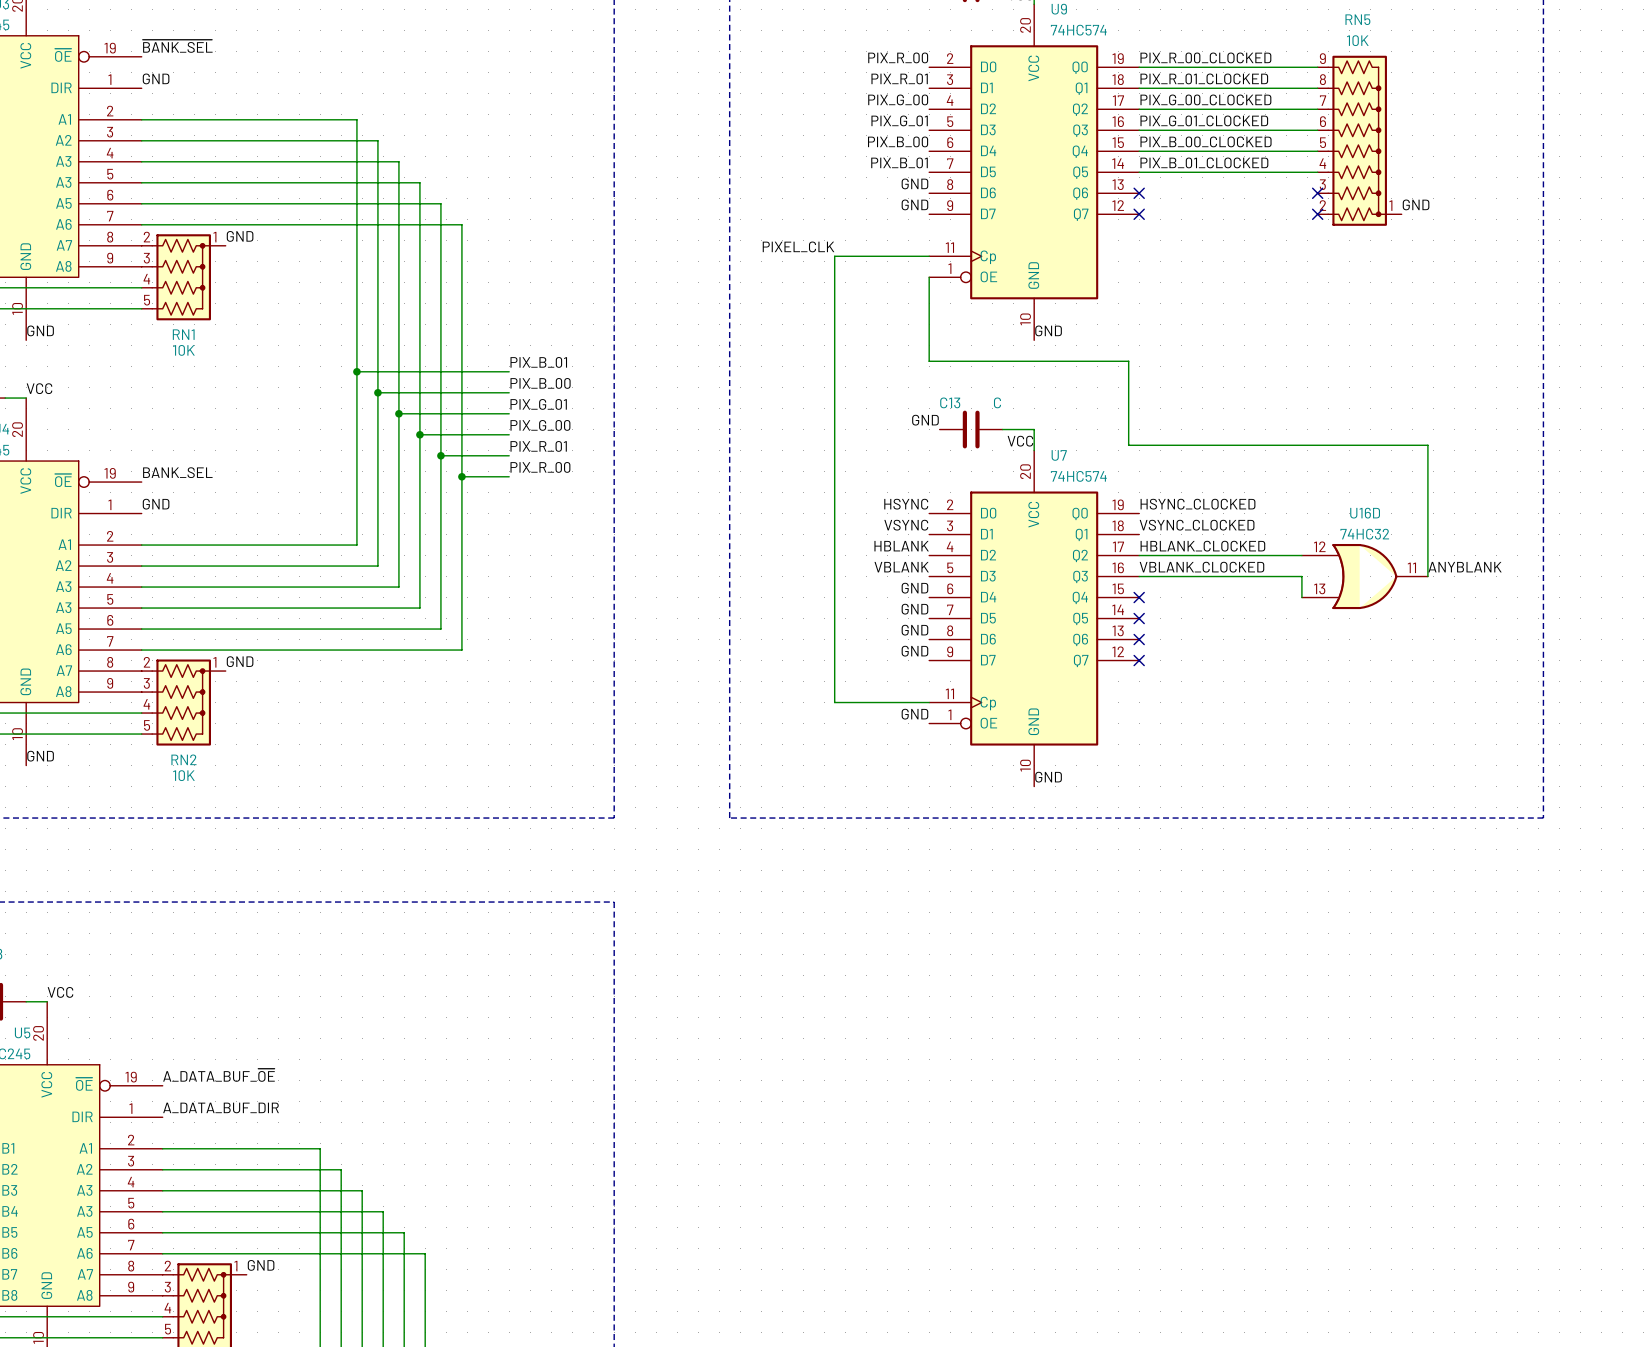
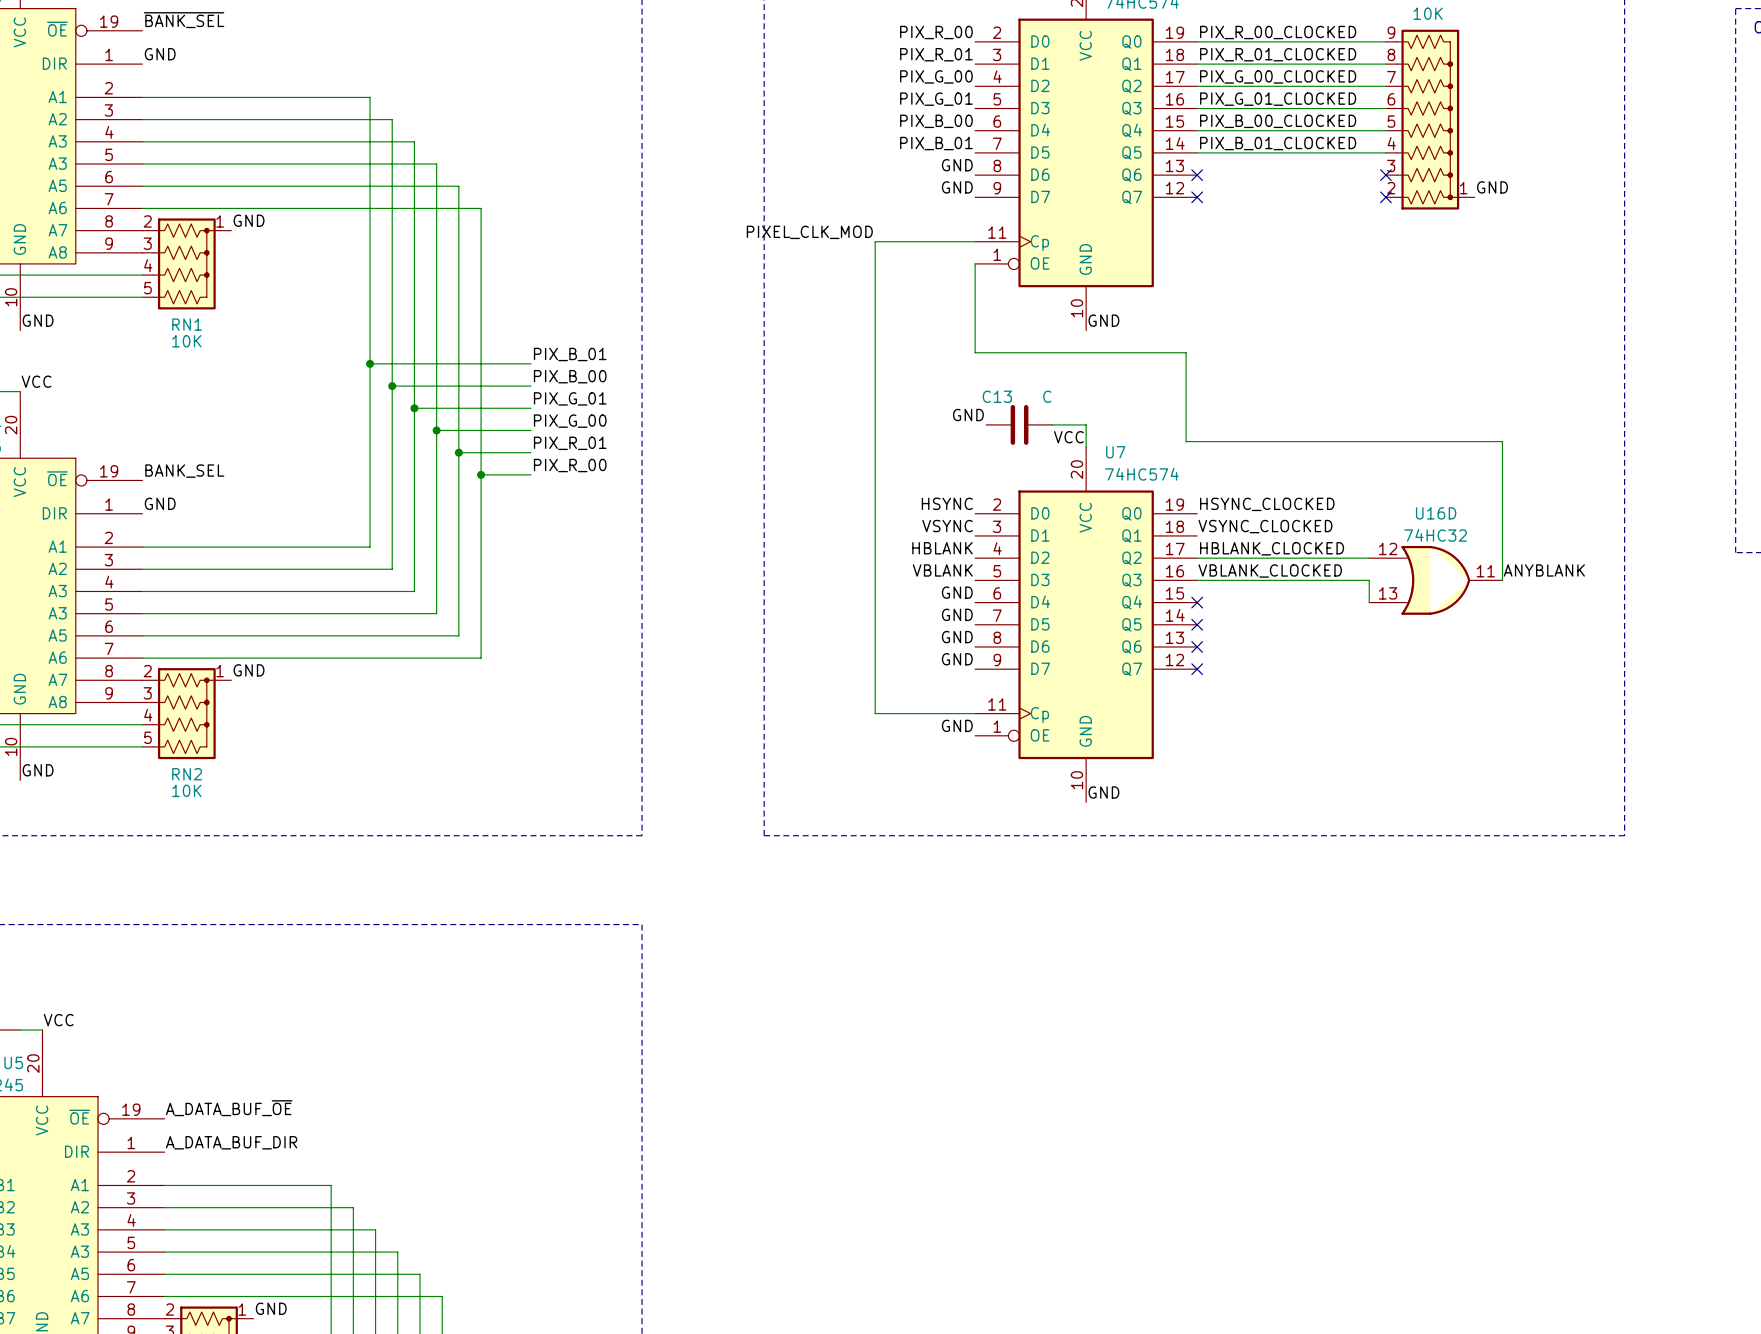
label: PIXEL_CLK (798, 246) -> PIXEL_CLK_MOD (809, 232)

